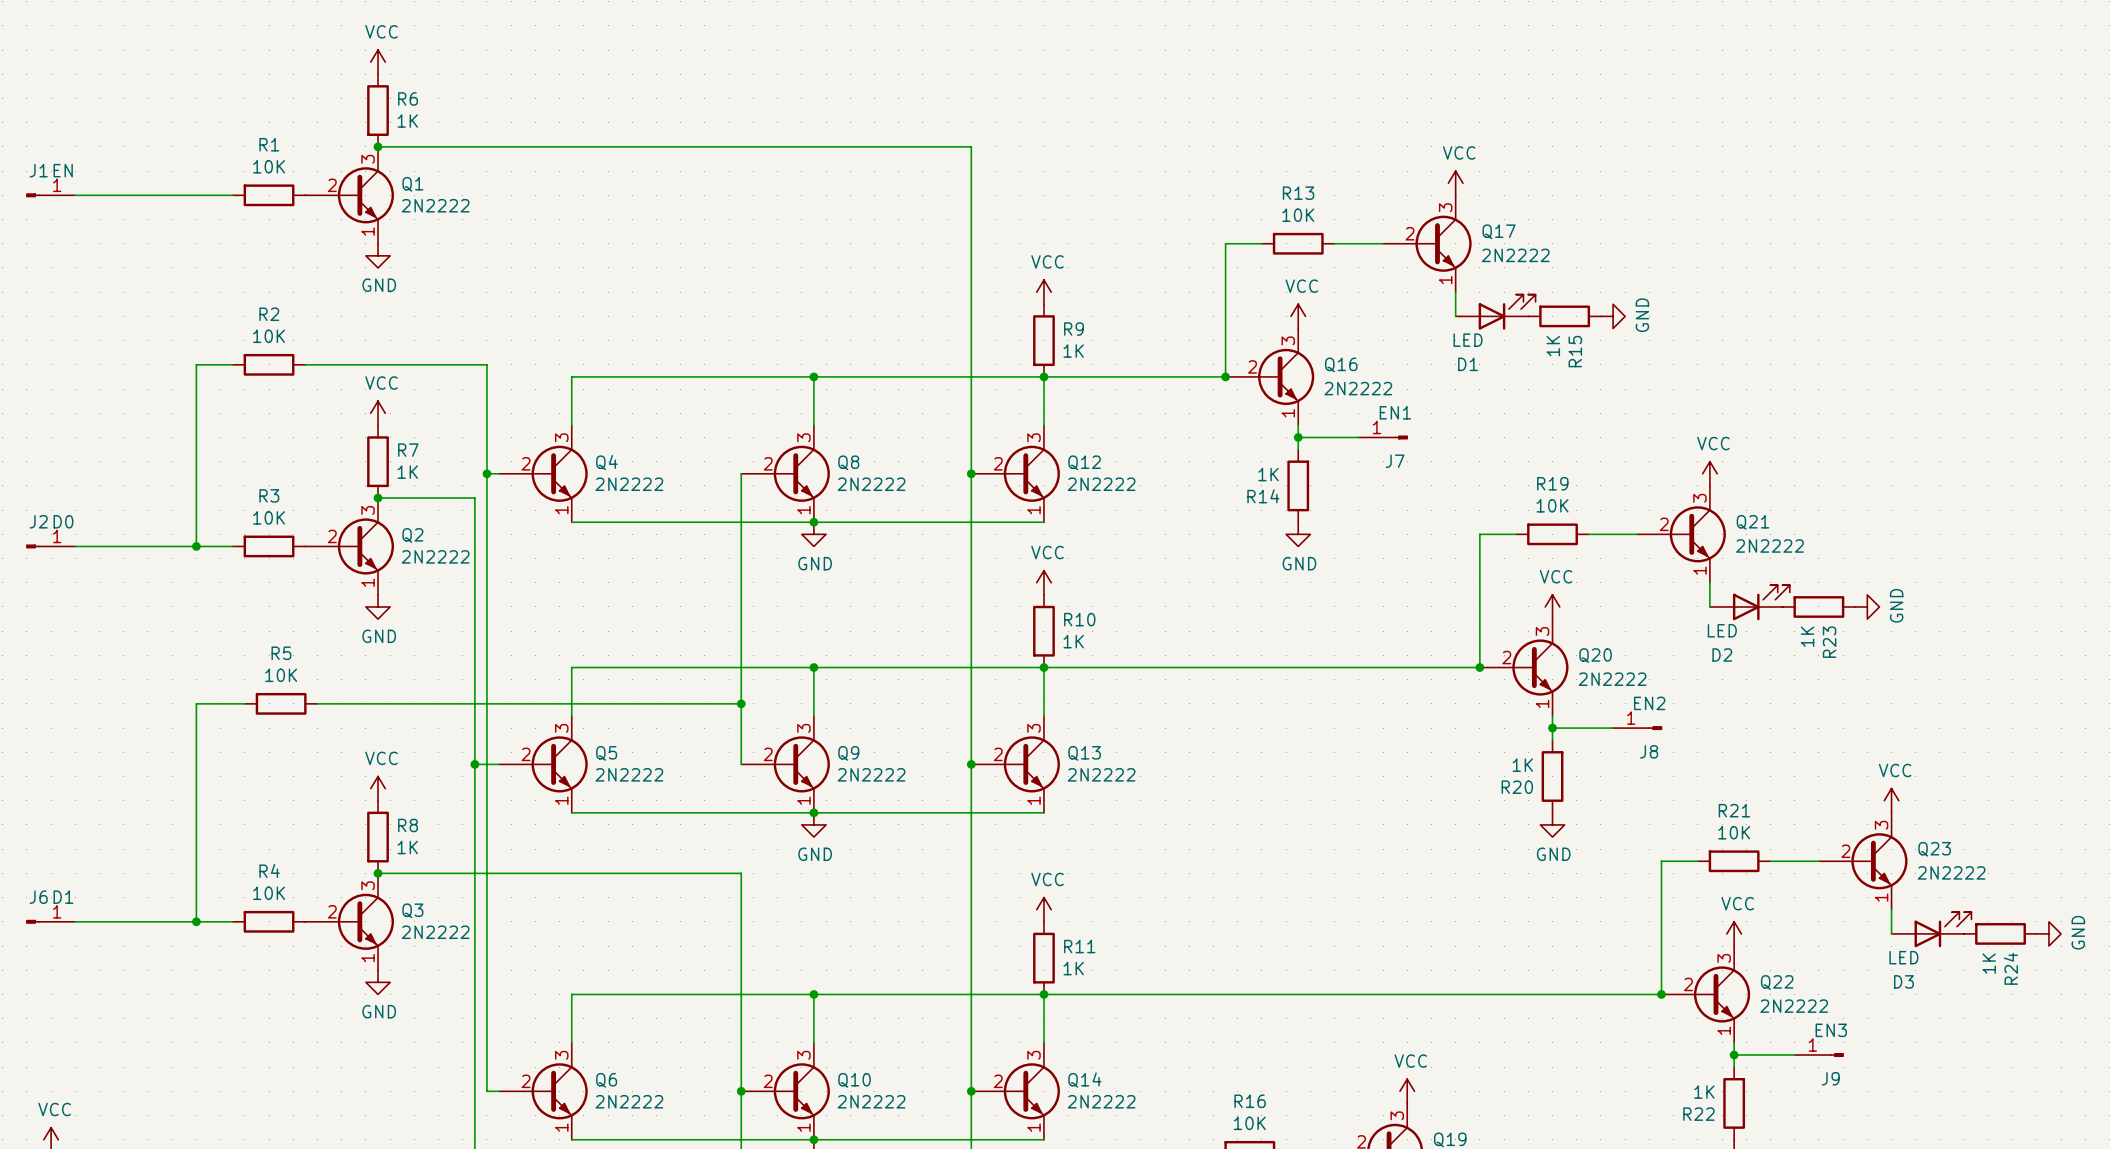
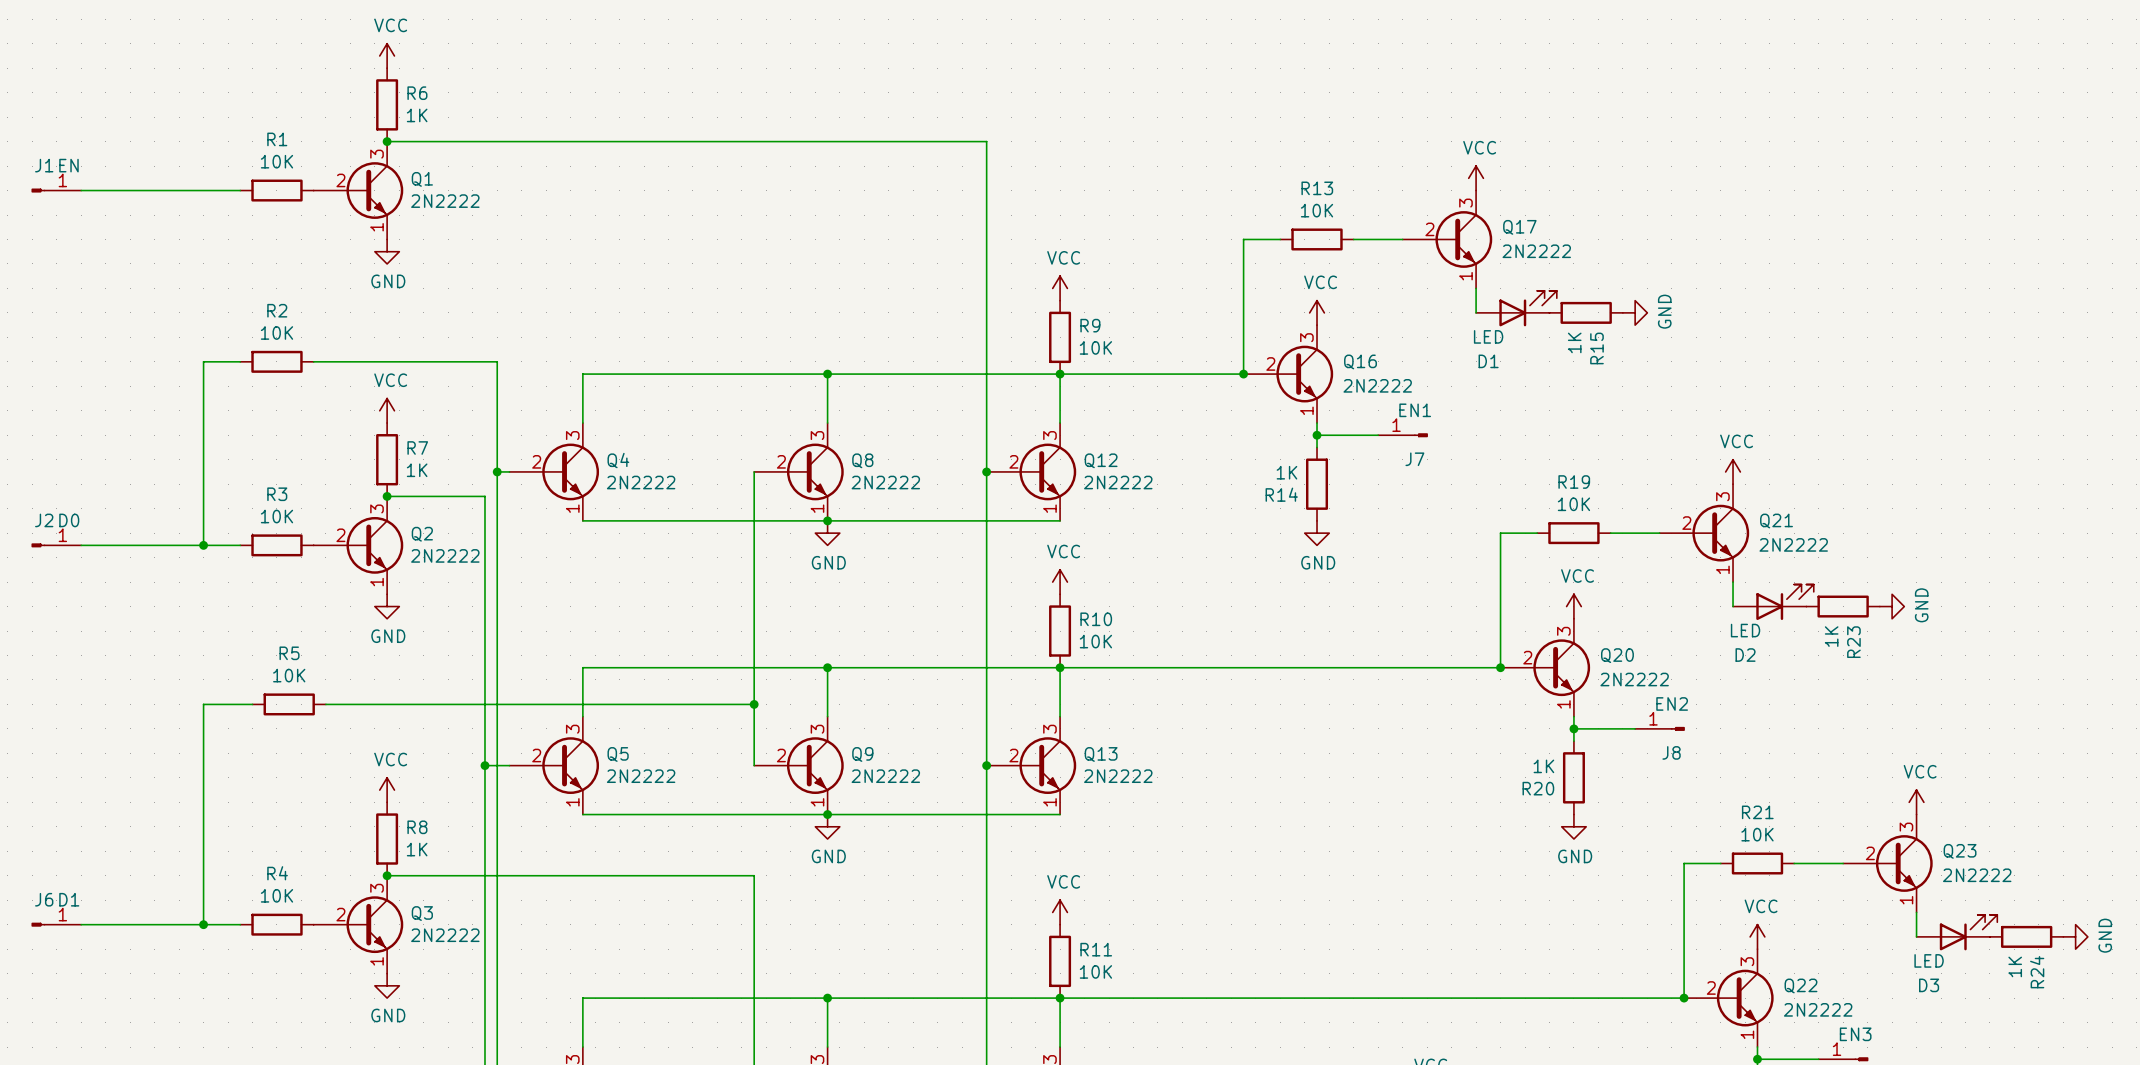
R9 value: 1K (1073, 351) -> 10K (1095, 347)
R10 value: 1K (1073, 641) -> 10K (1095, 641)
R11 value: 1K (1073, 968) -> 10K (1095, 971)

